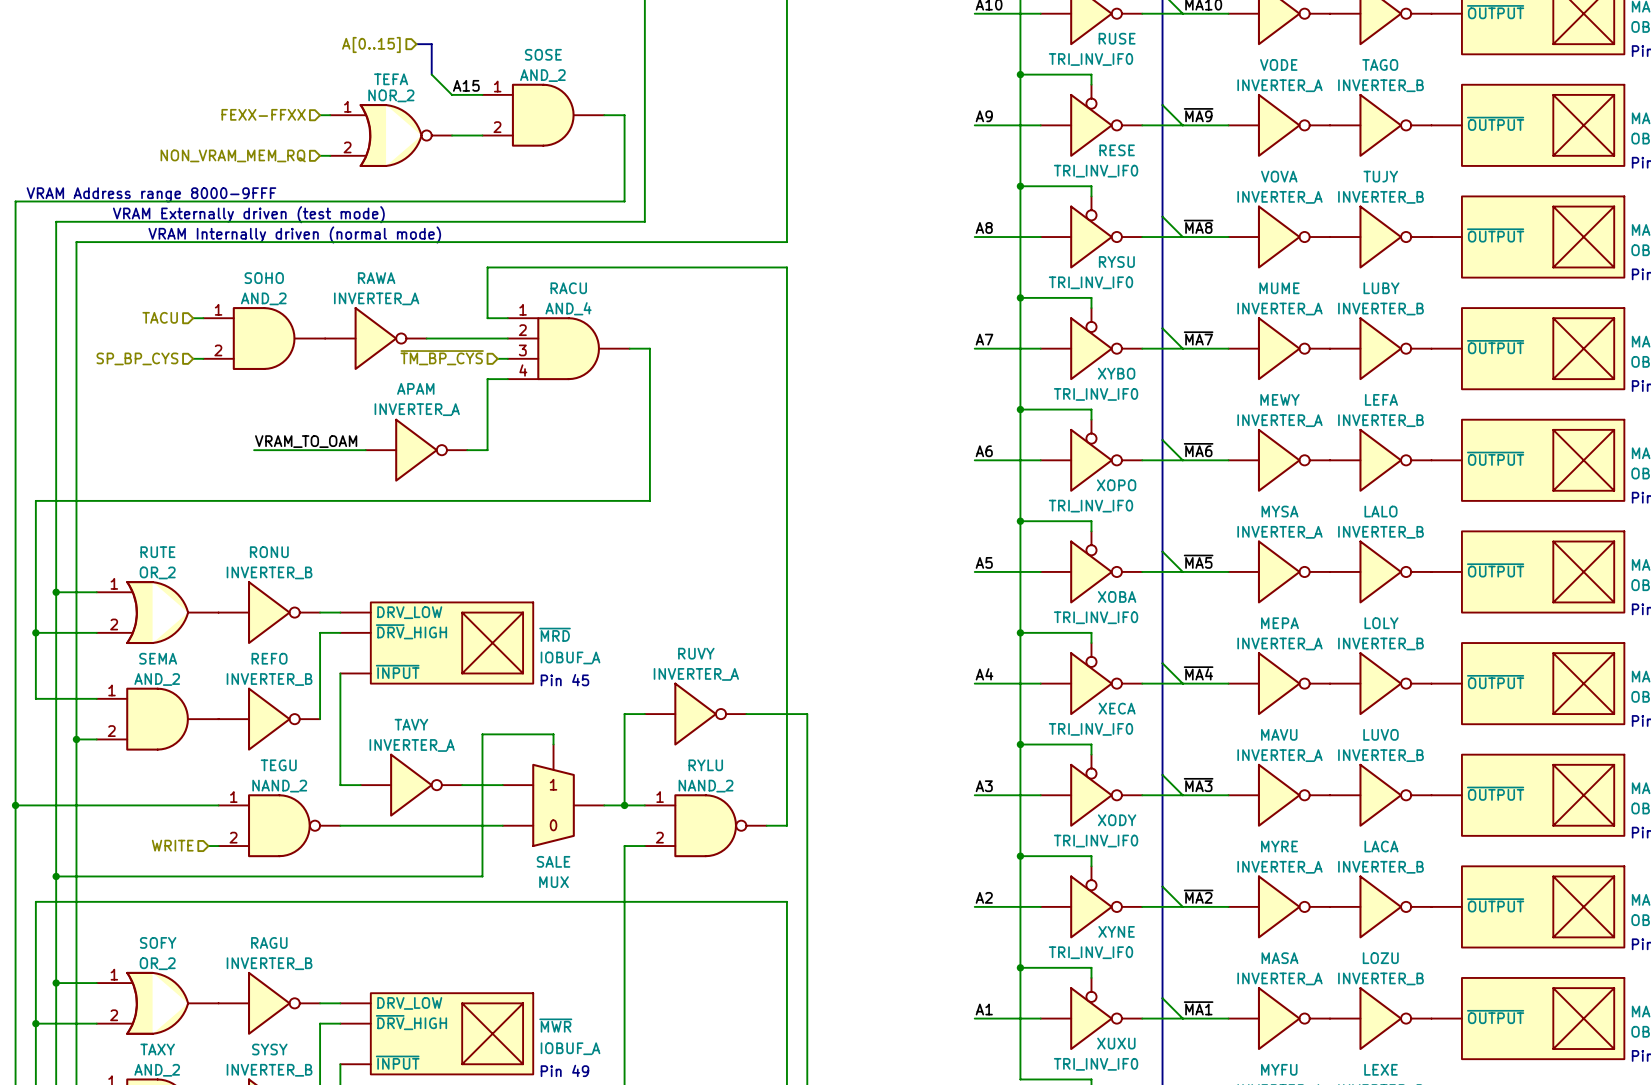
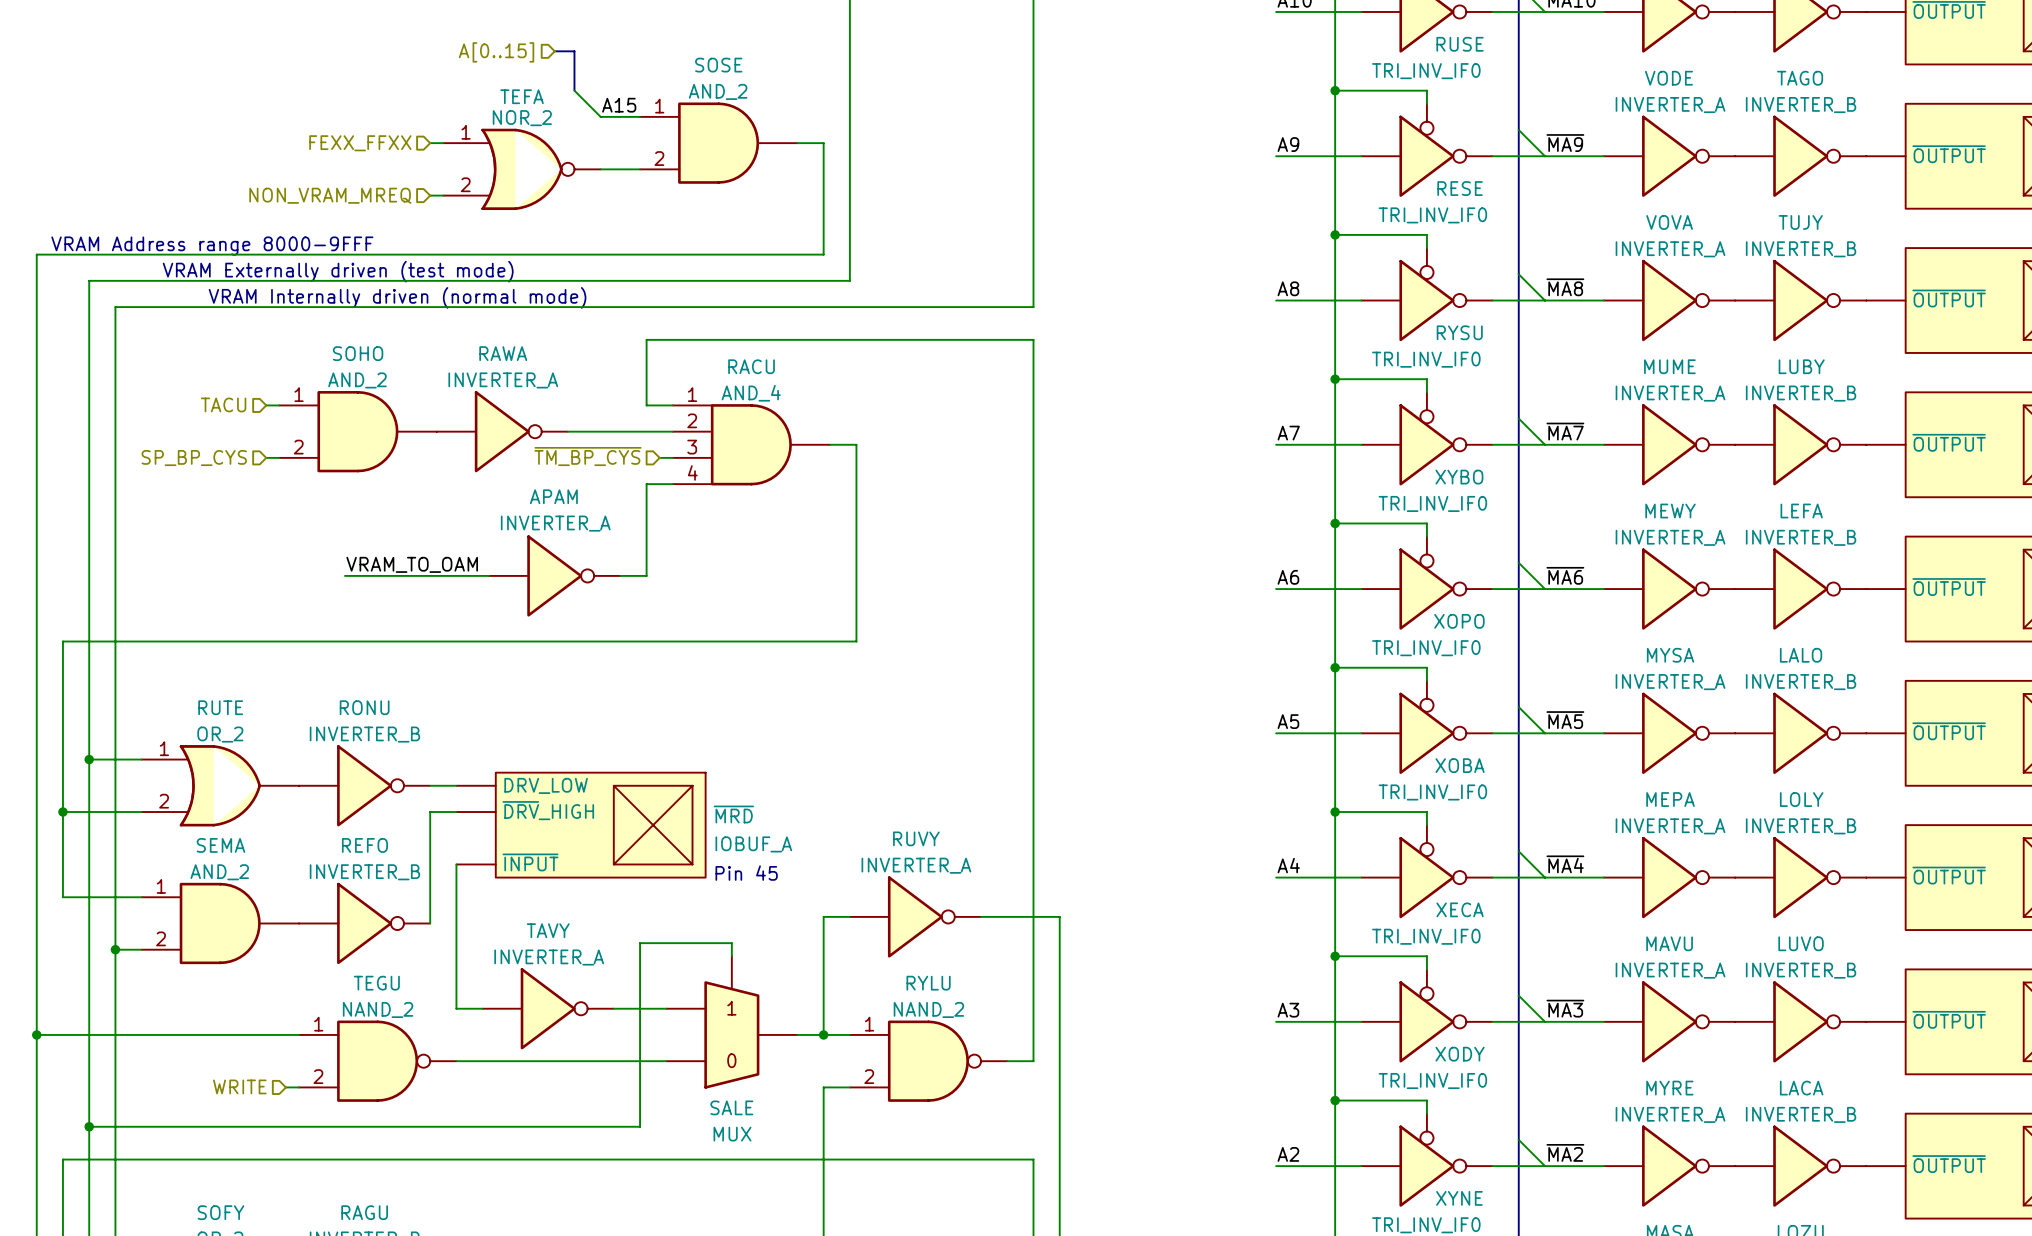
hierarchical label: FEXX-FFXX (263, 114) -> FEXX_FFXX (360, 143)
hierarchical label: NON_VRAM_MEM_RQ (233, 155) -> NON_VRAM_MREQ (330, 195)

